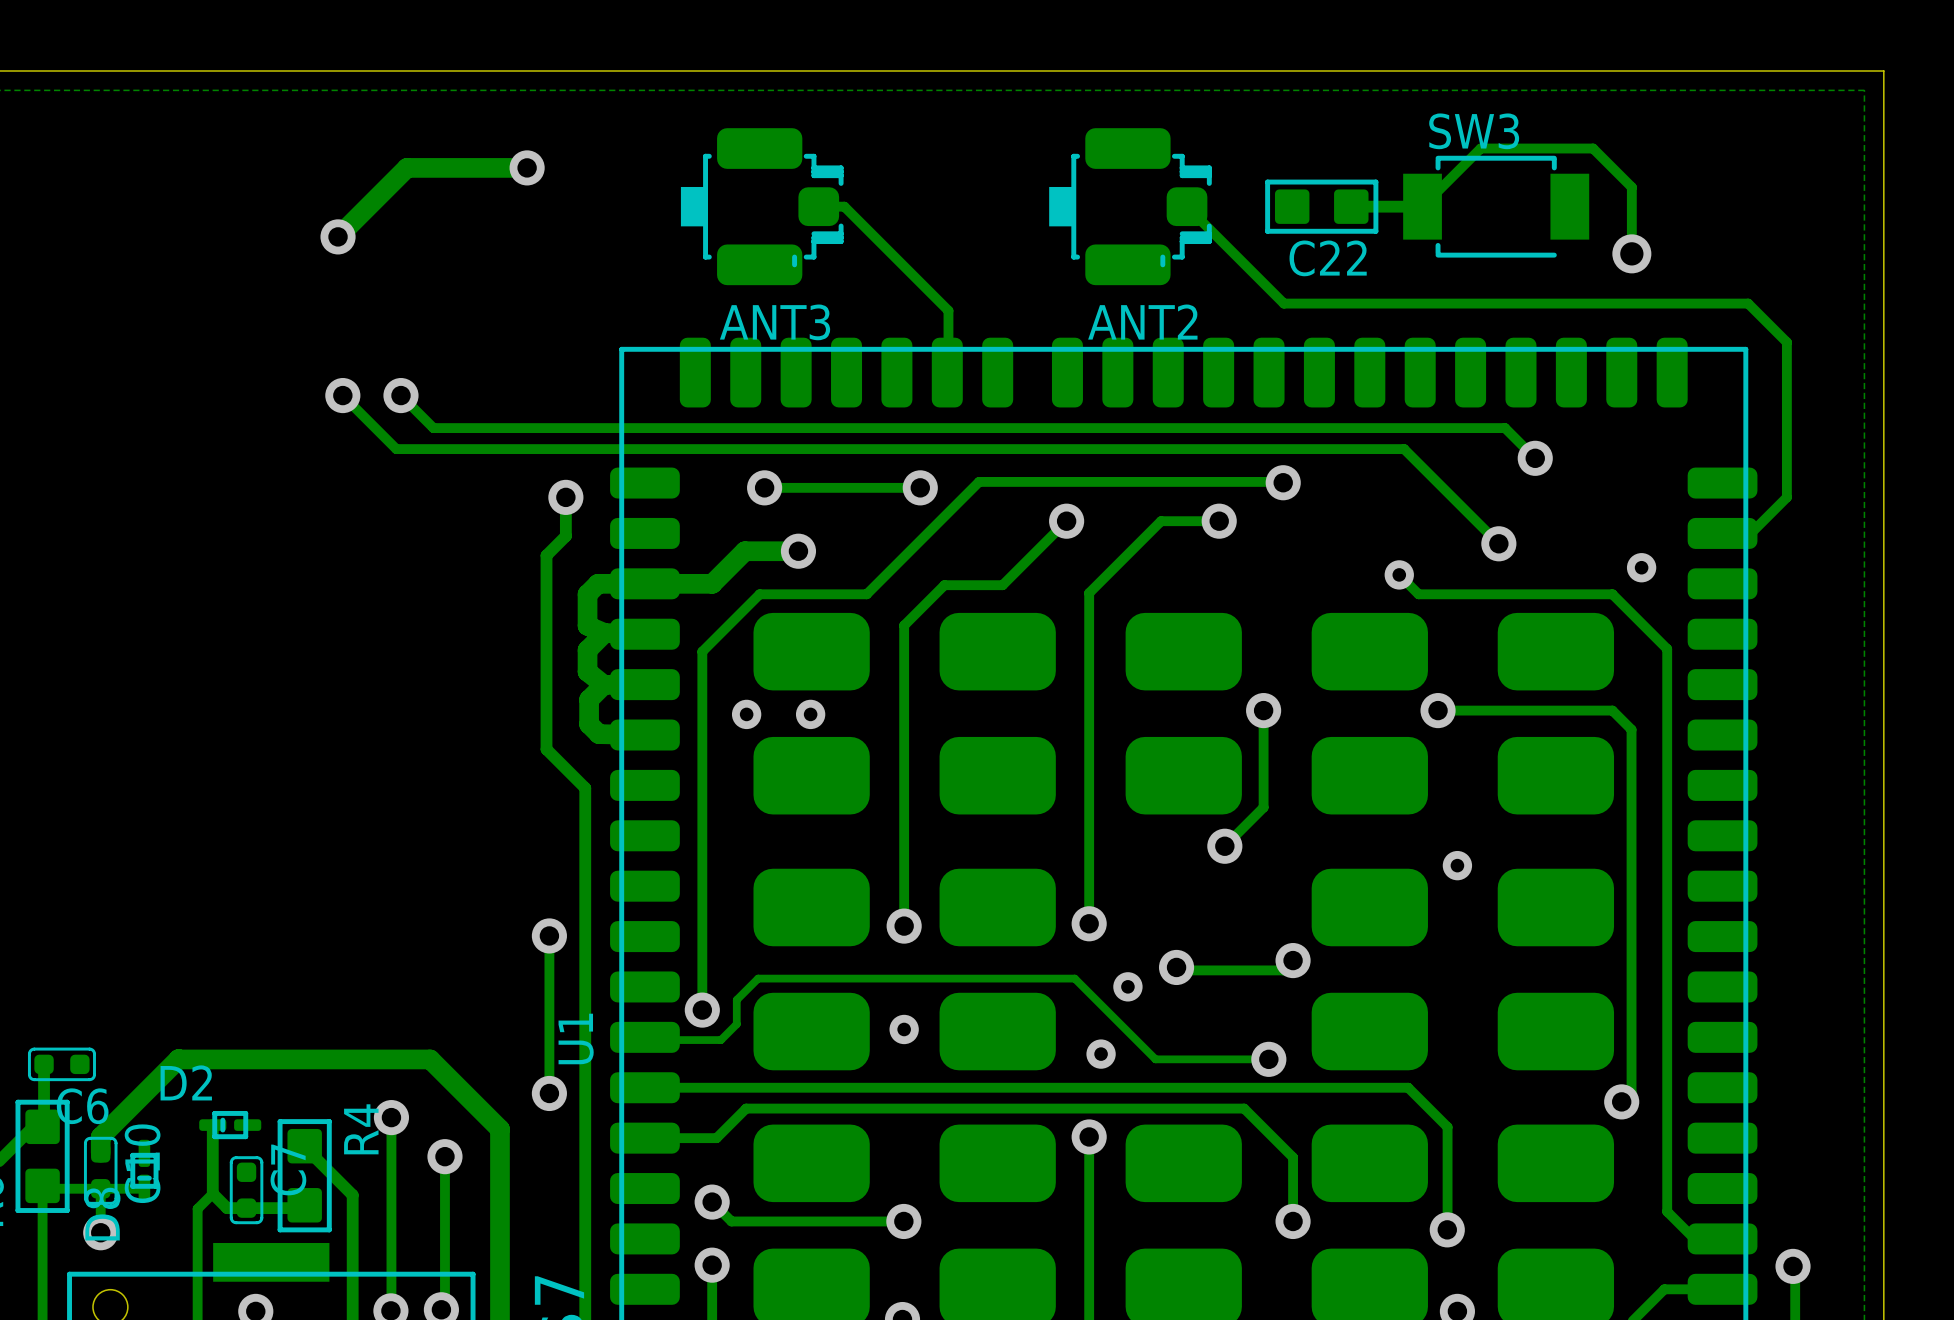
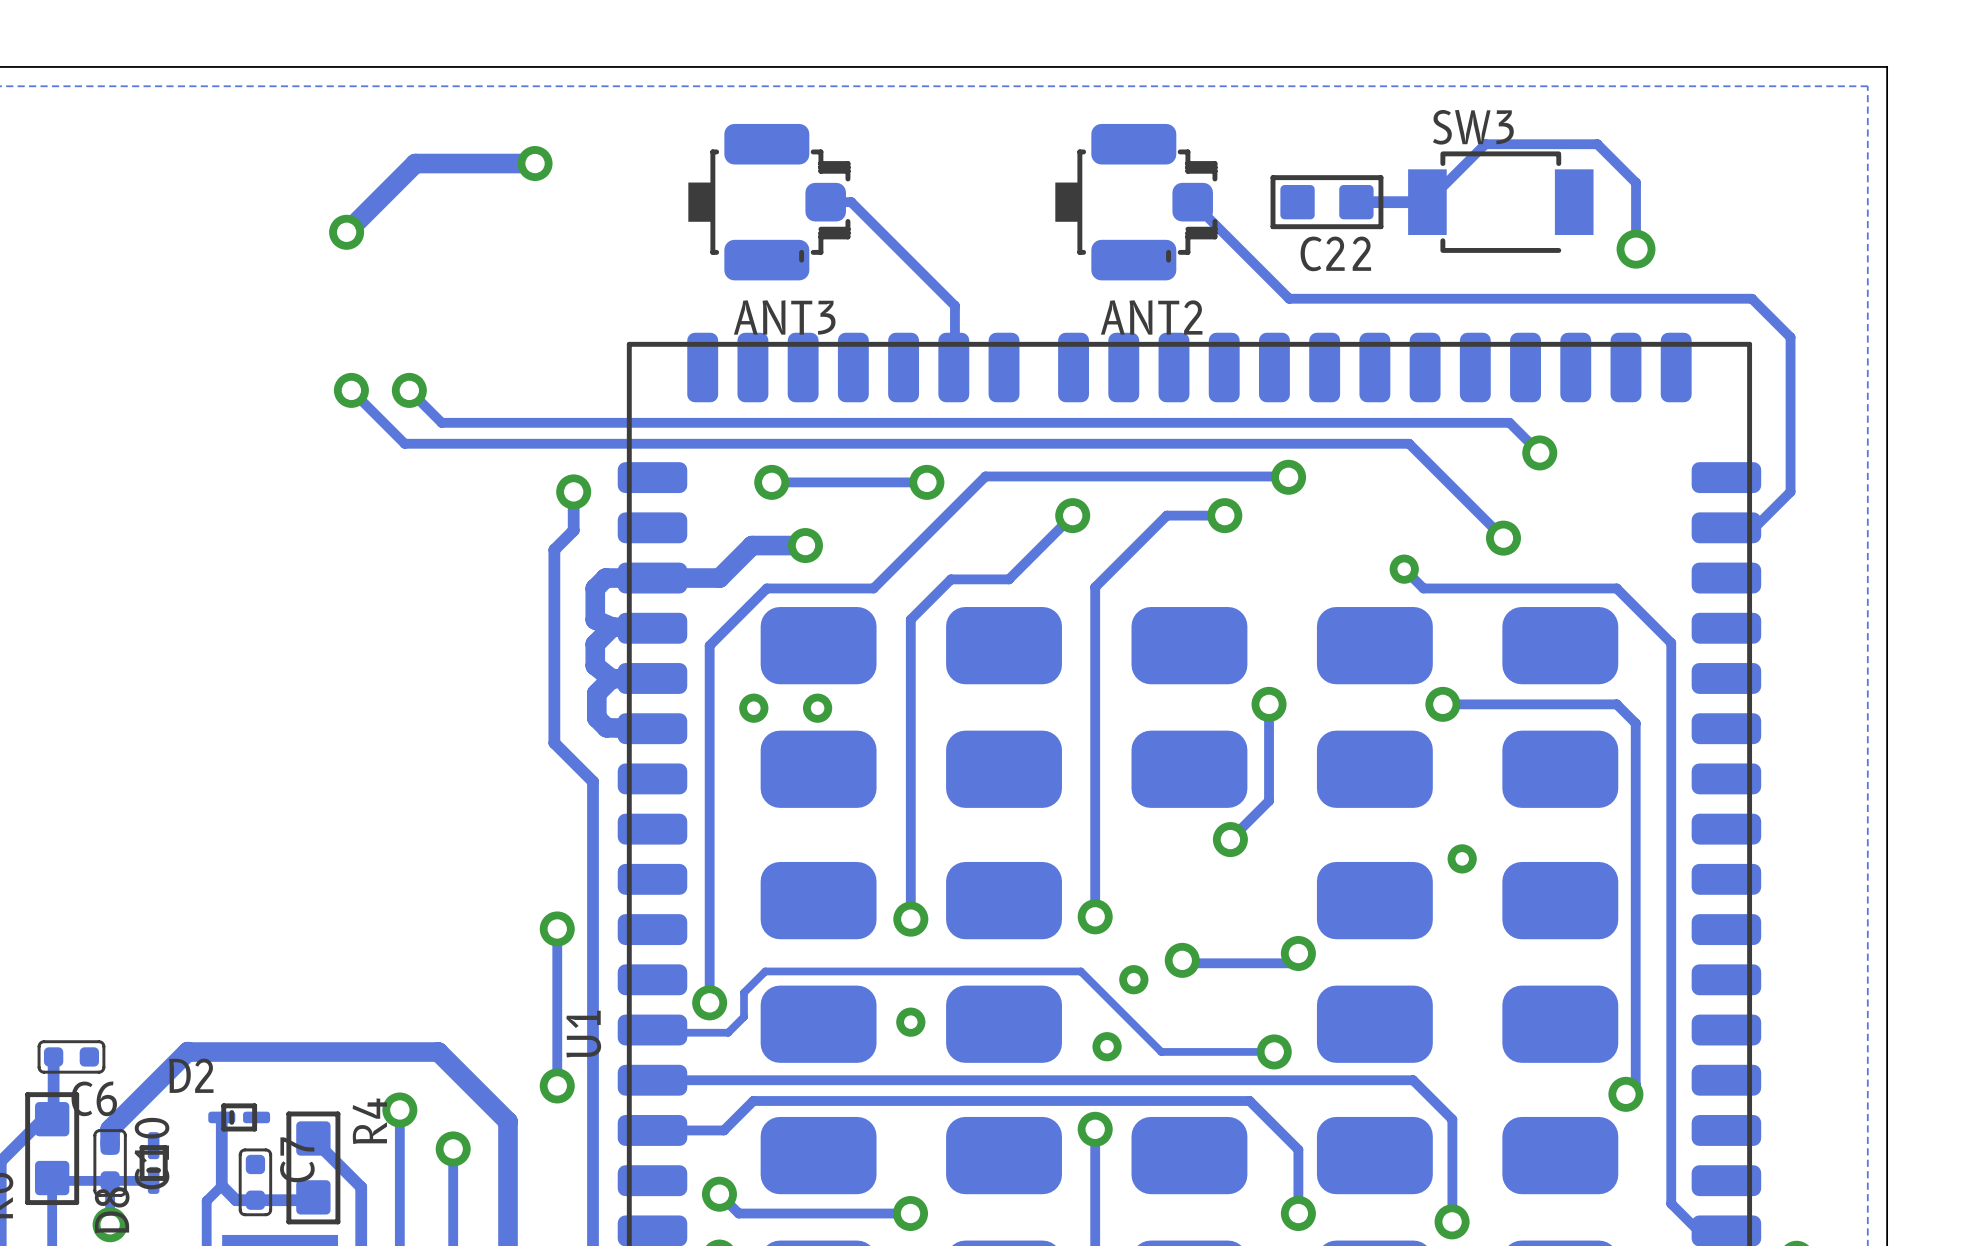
via: (1641, 567) -> none

